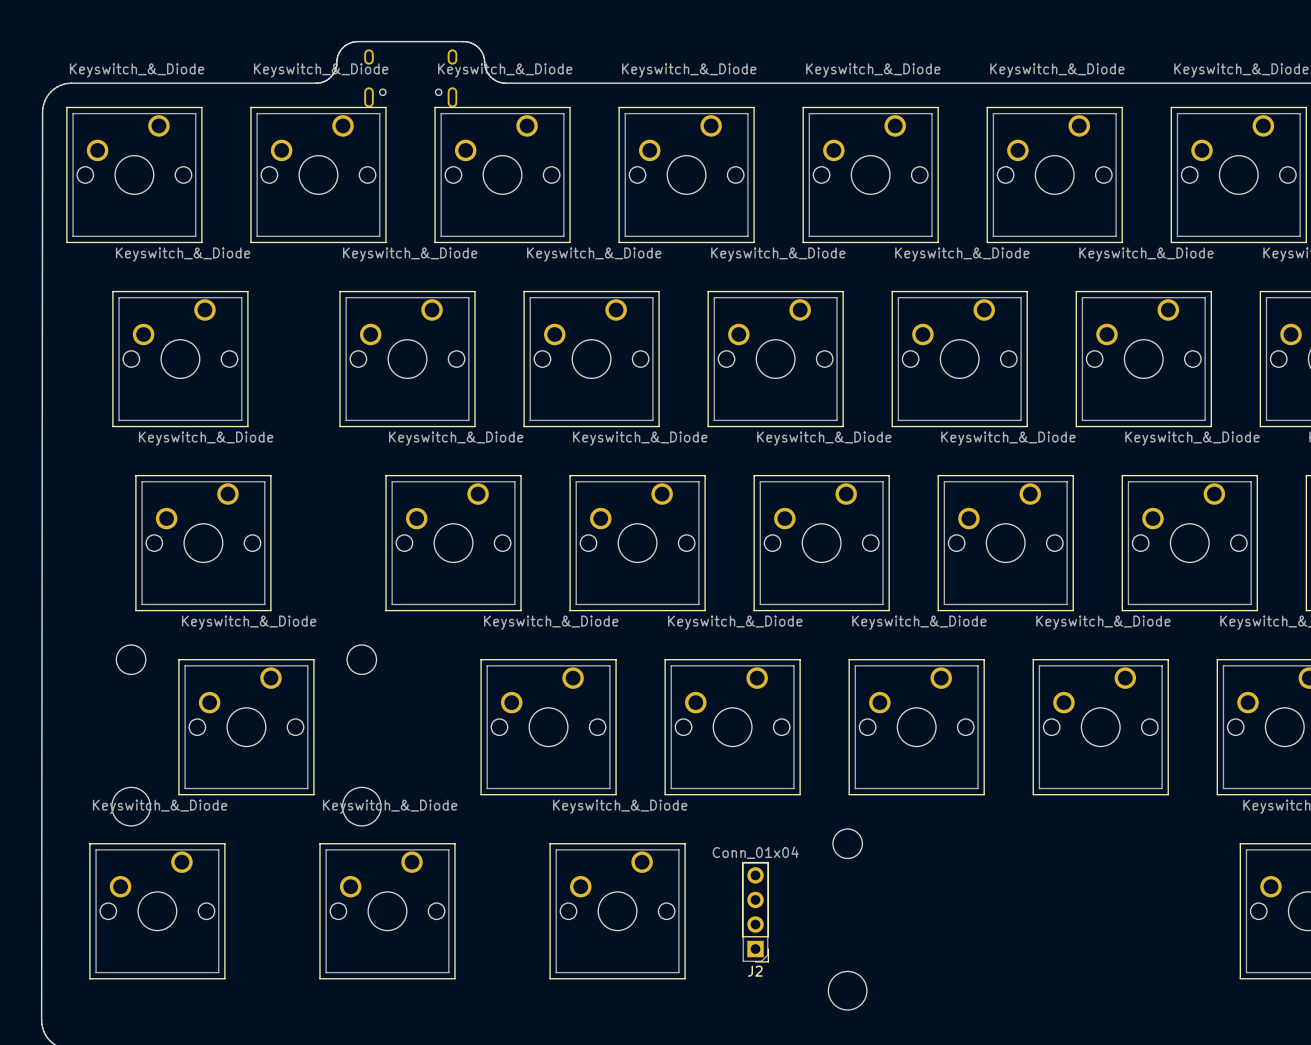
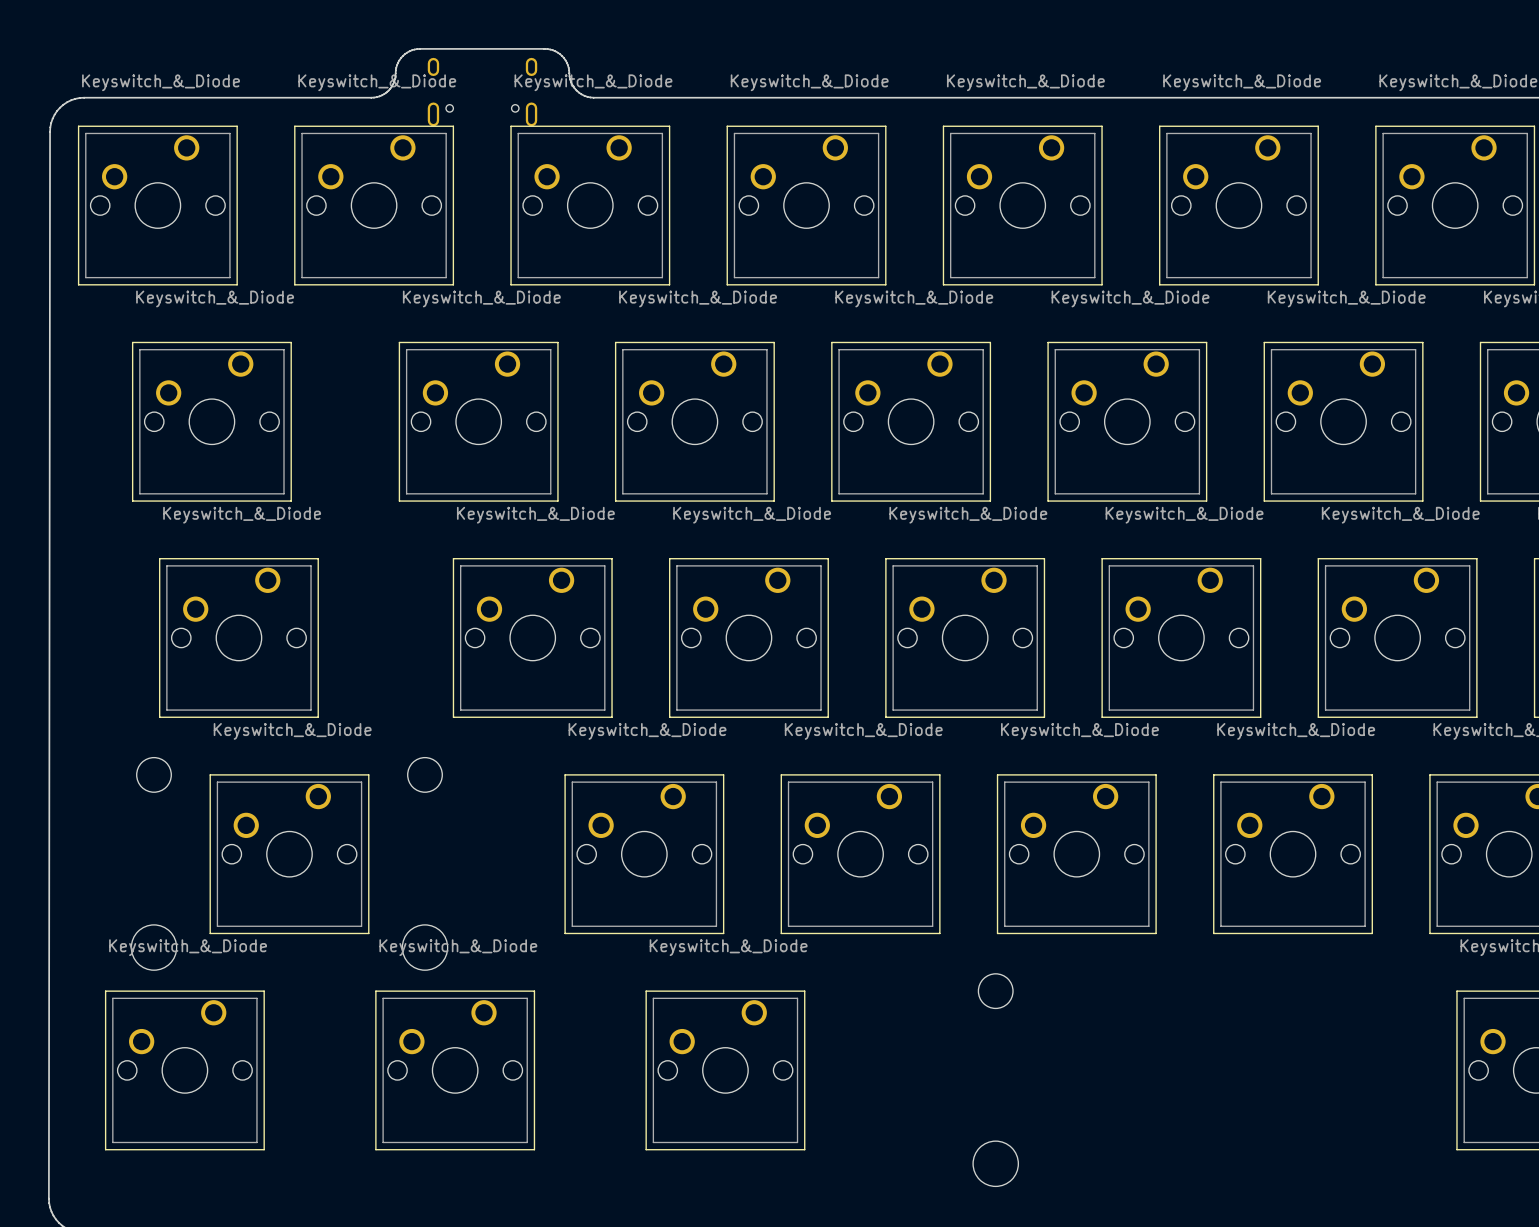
J2: Conn_01x04 (755, 912) -> none

